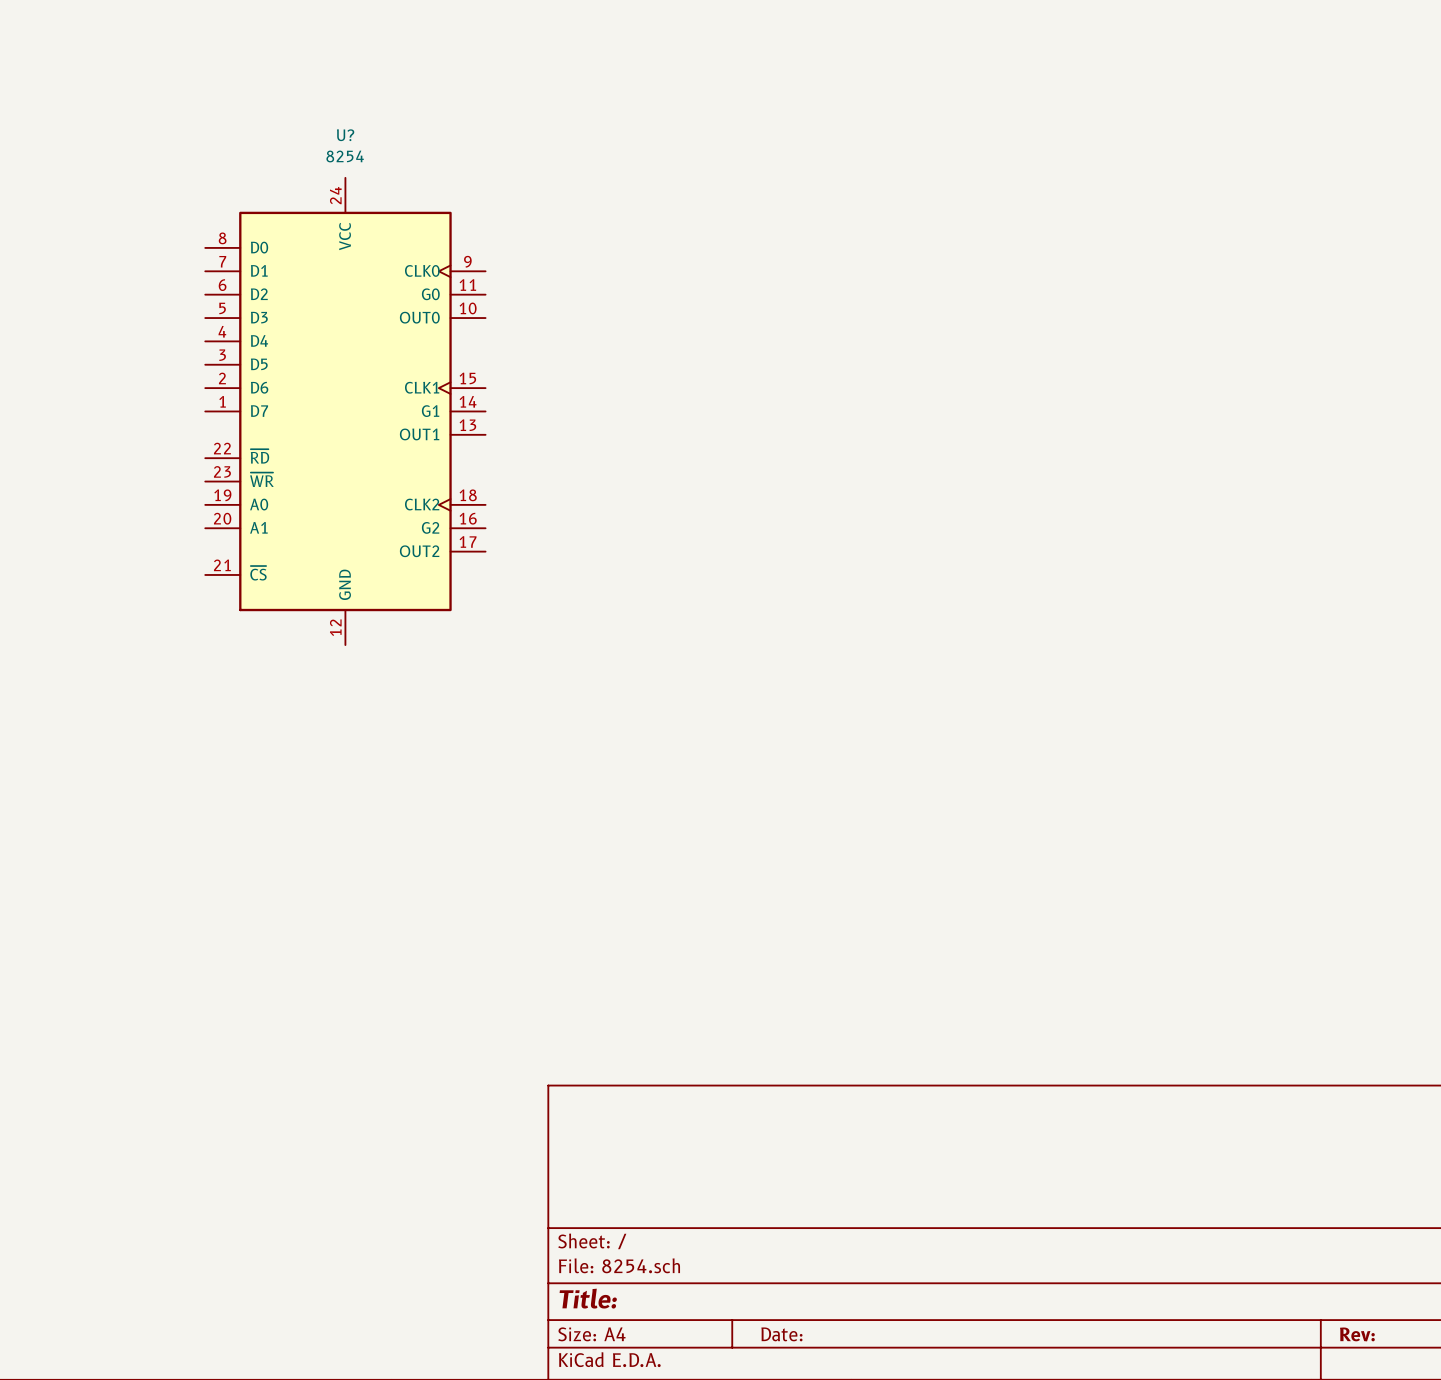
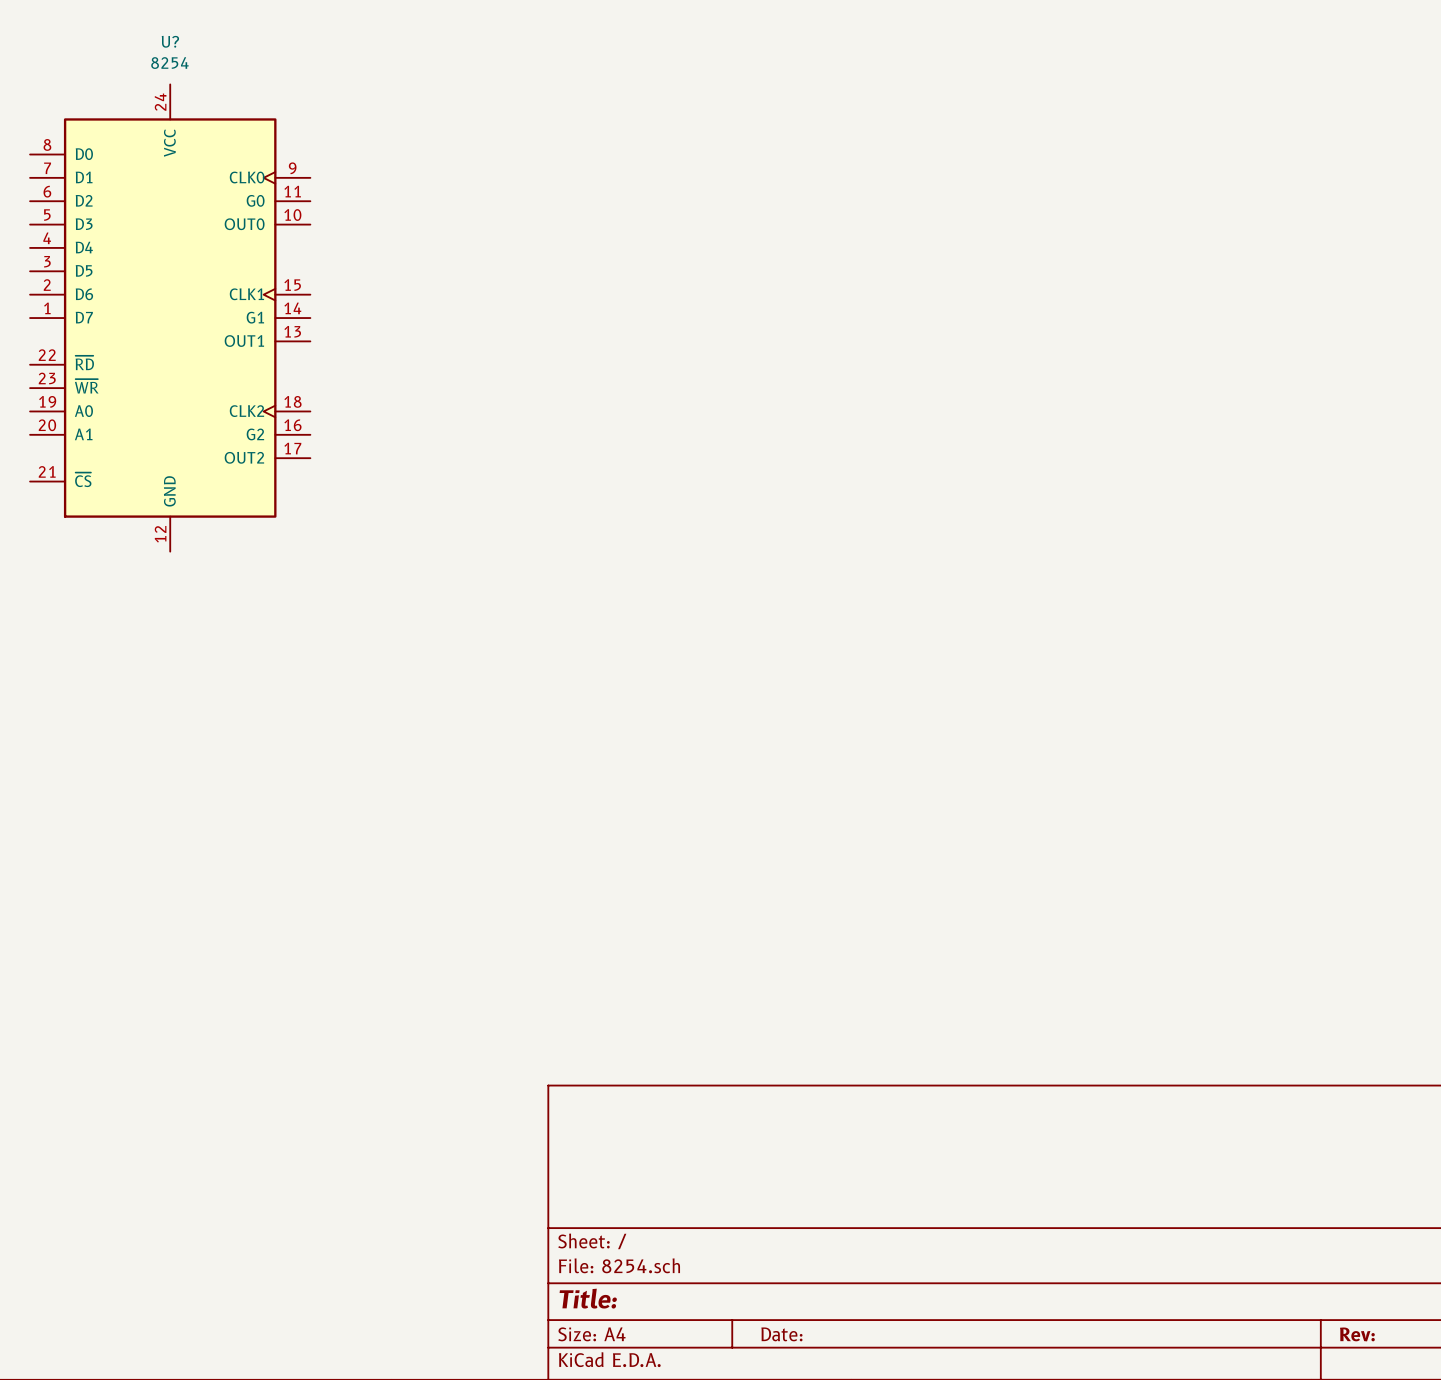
U? position: (345, 411) -> (170, 318)

